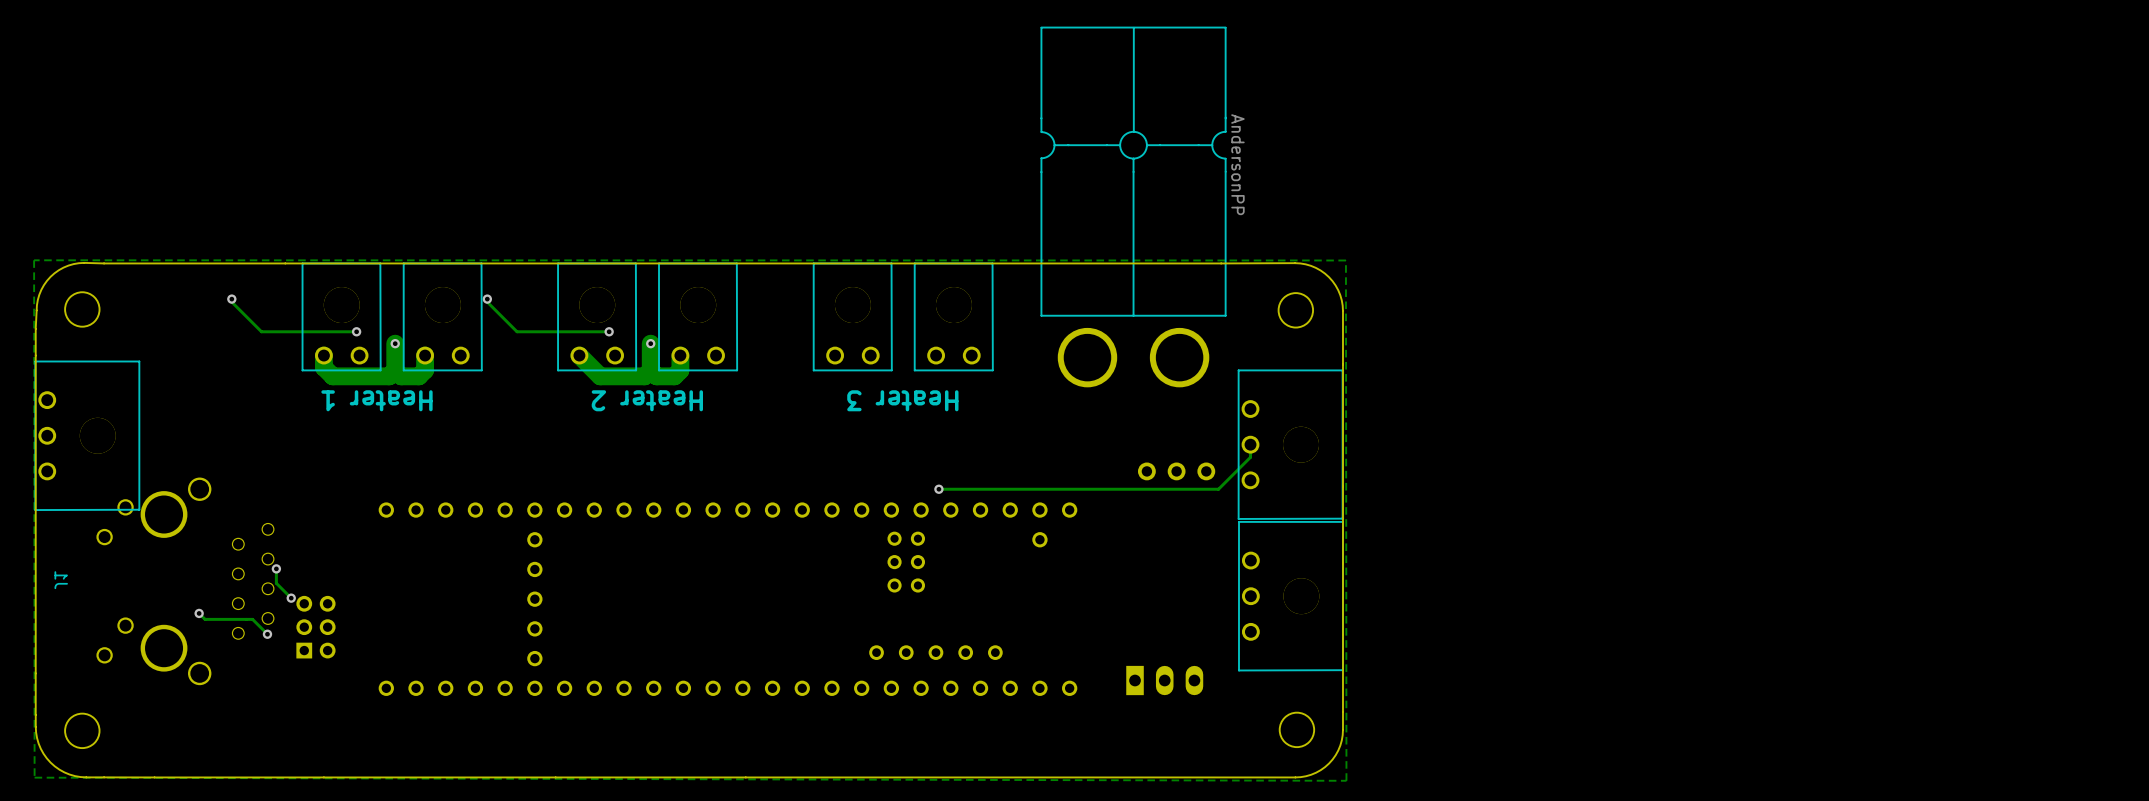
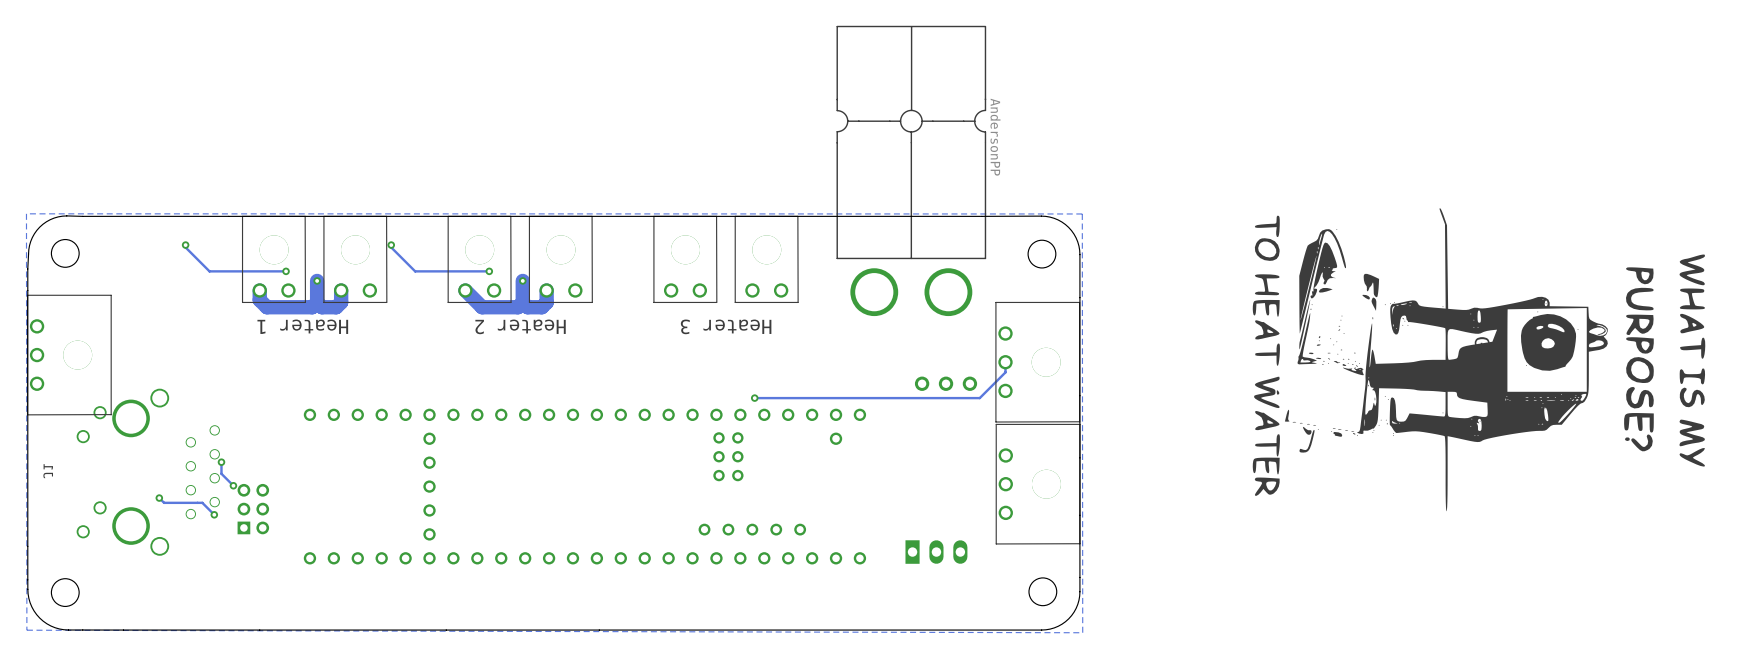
part: none -> (1479, 359)

